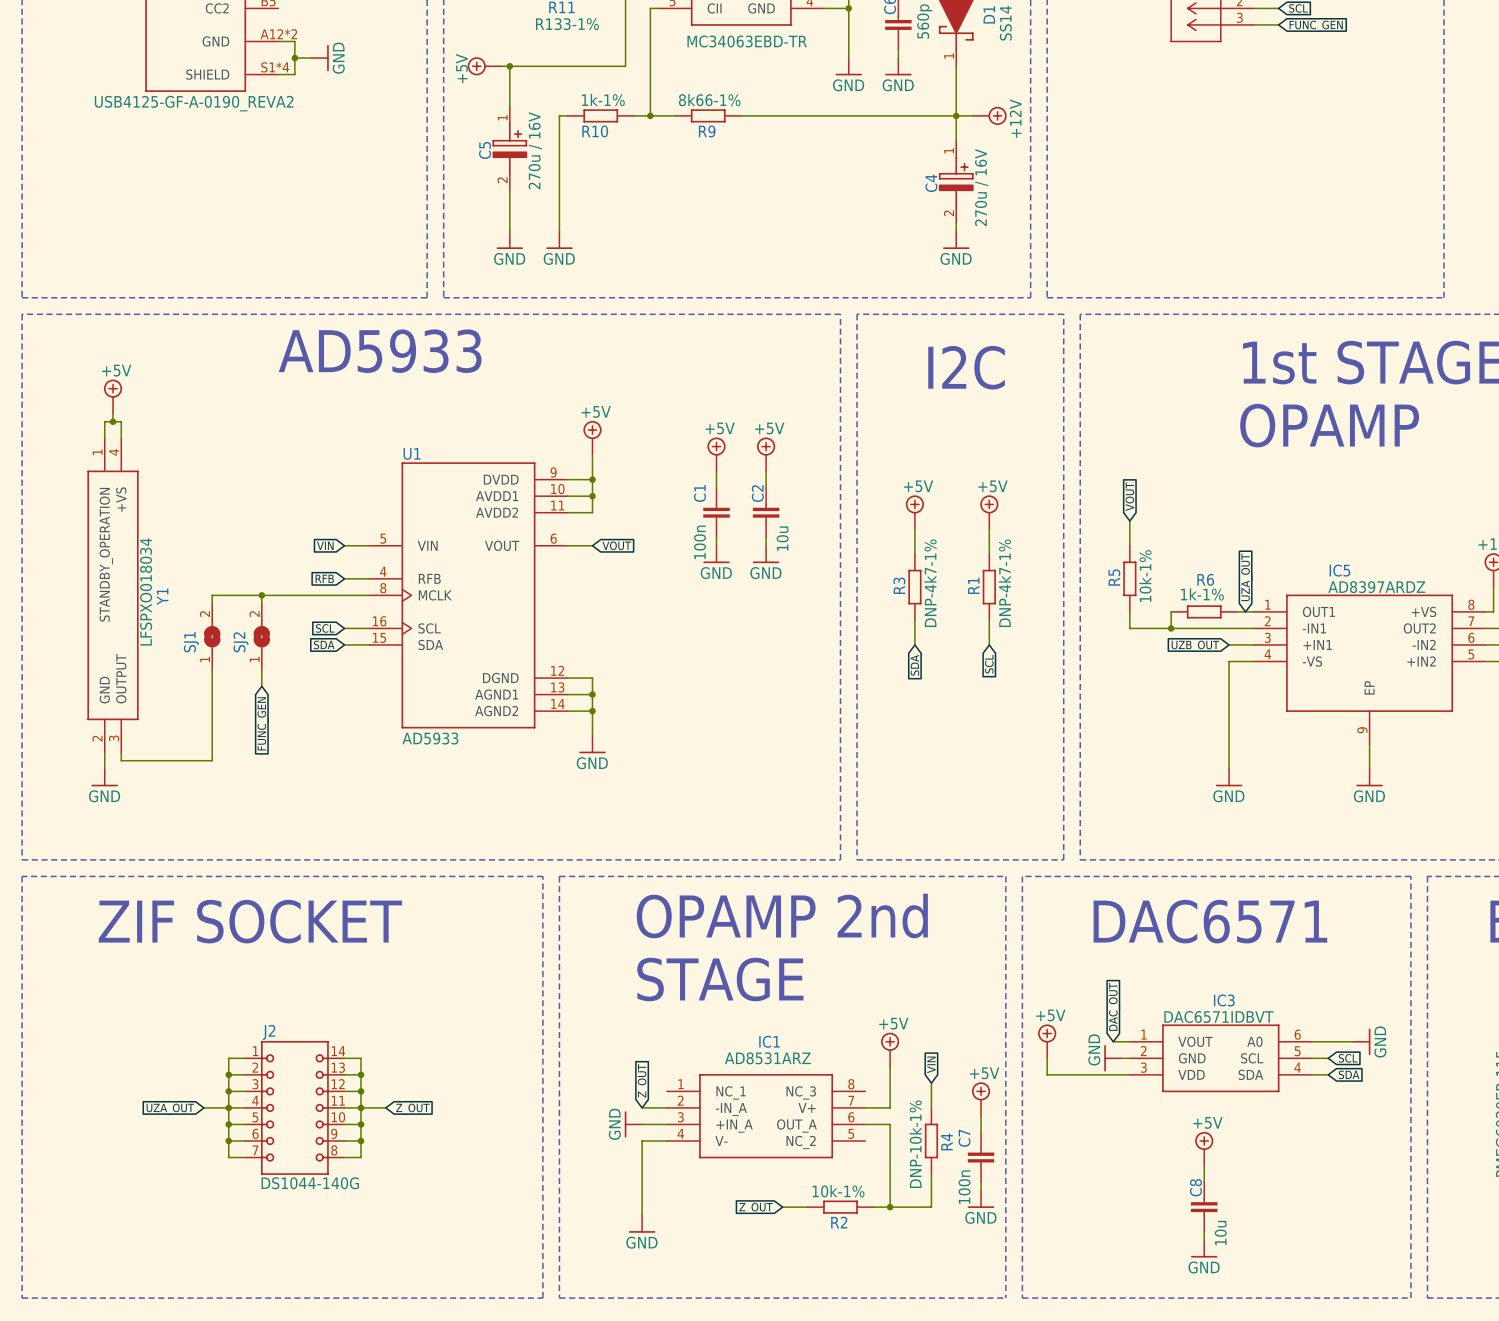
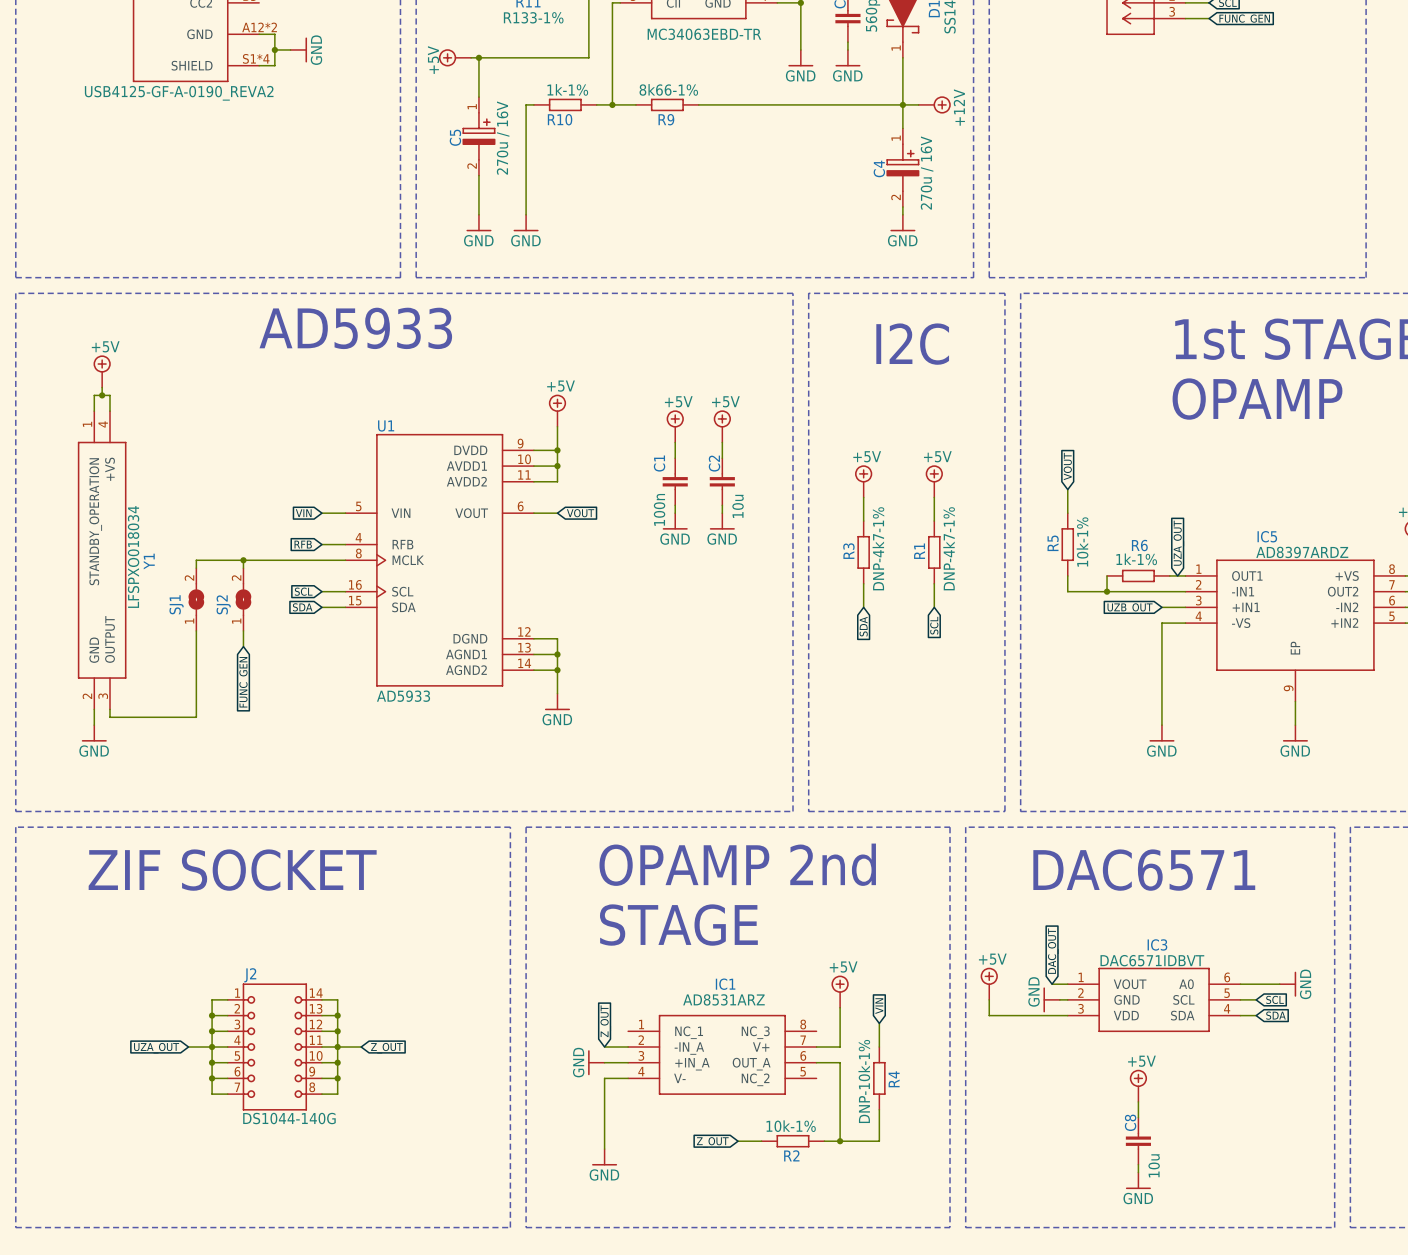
power symbol: +5V (981, 1099) -> none
wire: (981, 1116) (981, 1132) -> none
C7: 100n (981, 1157) -> none
wire: (981, 1182) (981, 1190) -> none
power symbol: GND (981, 1199) -> none

